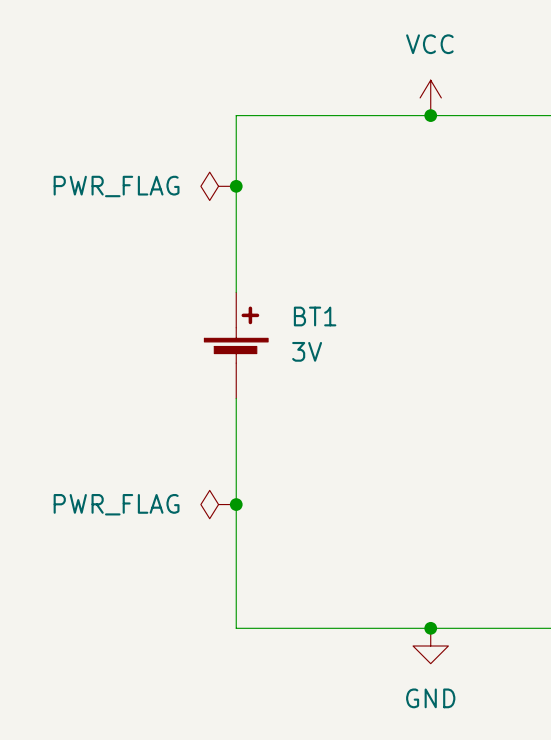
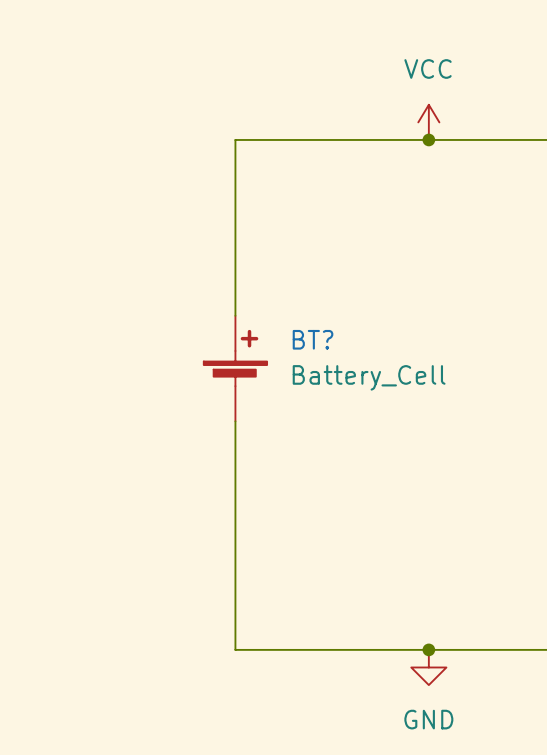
power symbol: PWR_FLAG (218, 186) -> none
junction: (236, 186) -> none
BT1 name: BT1 (315, 316) -> BT? (313, 339)
BT1 value: 3V (307, 351) -> Battery_Cell (369, 377)
power symbol: PWR_FLAG (218, 504) -> none
junction: (236, 504) -> none

